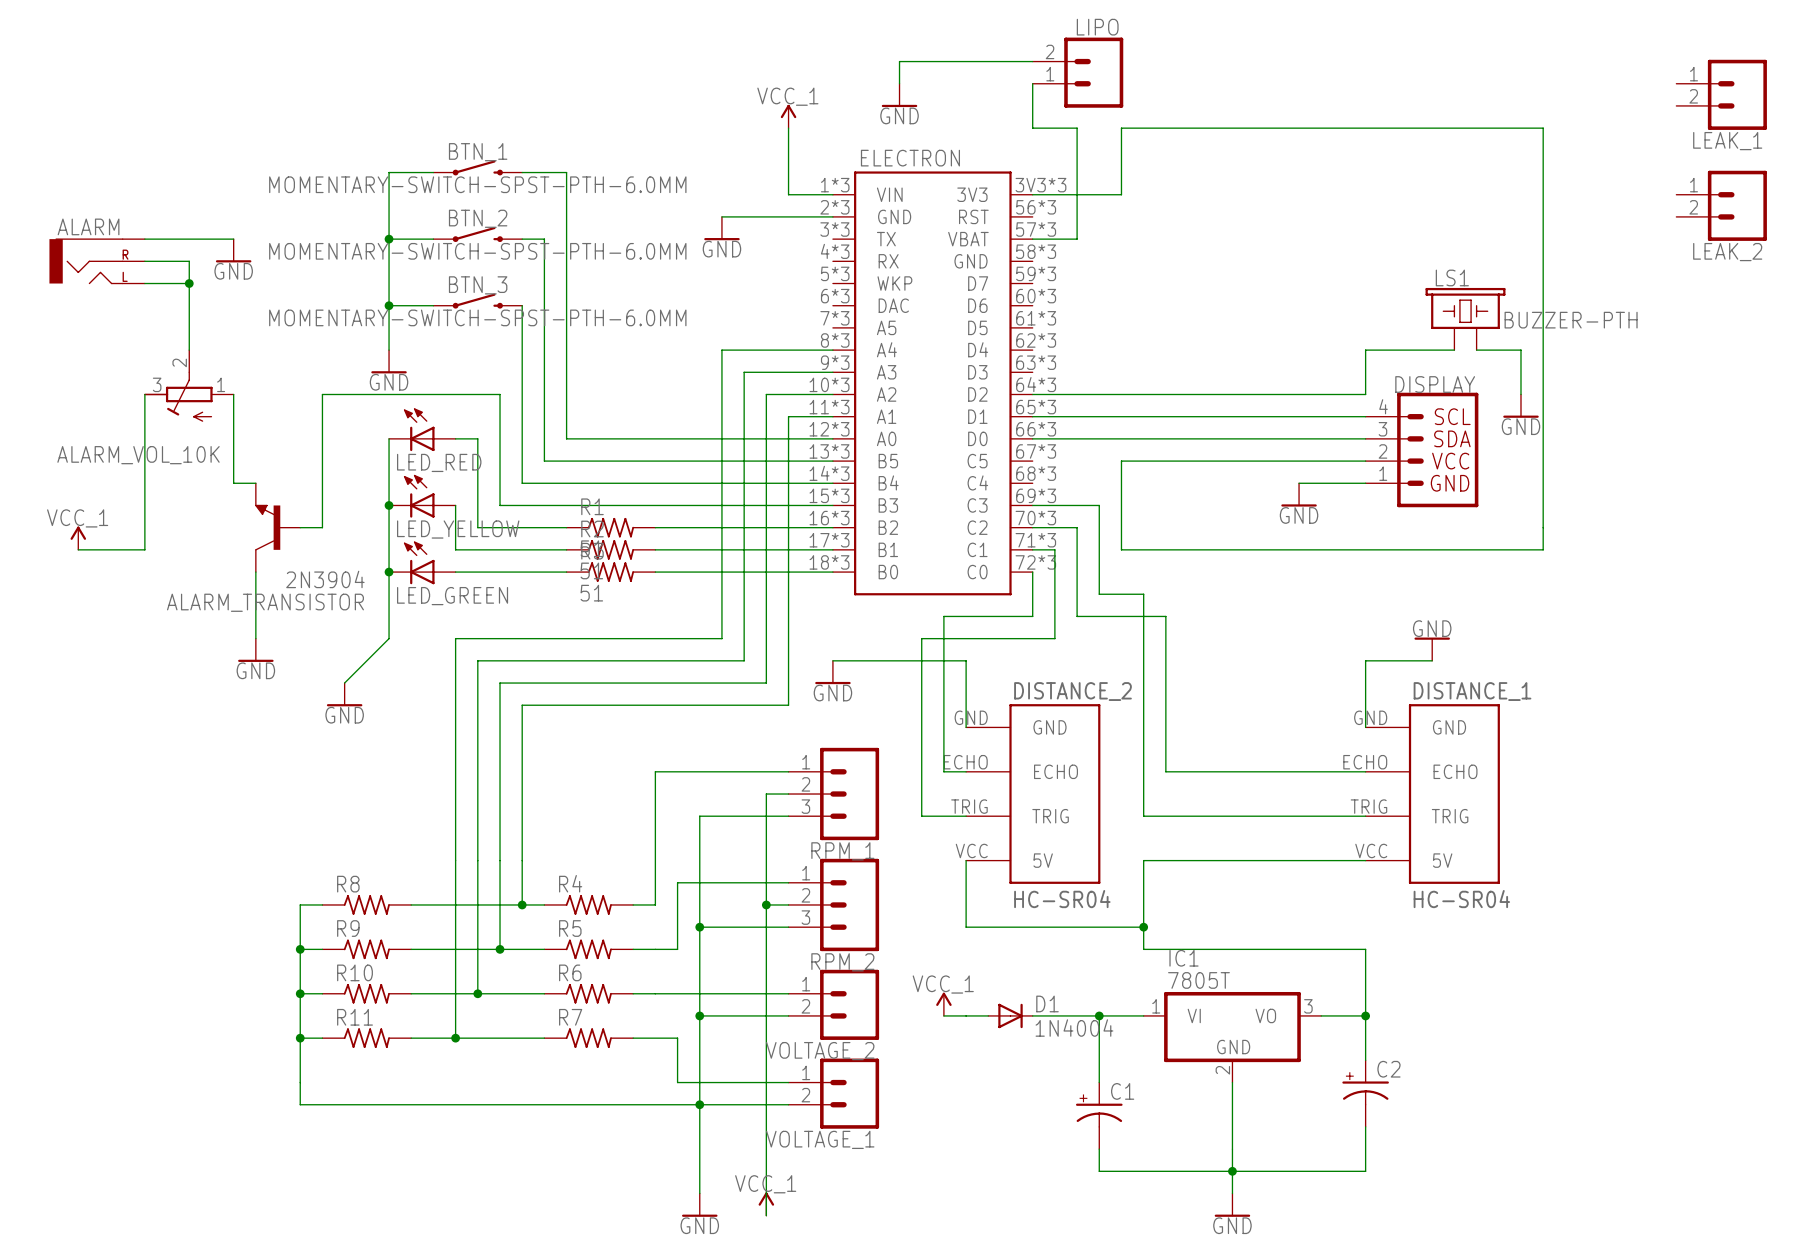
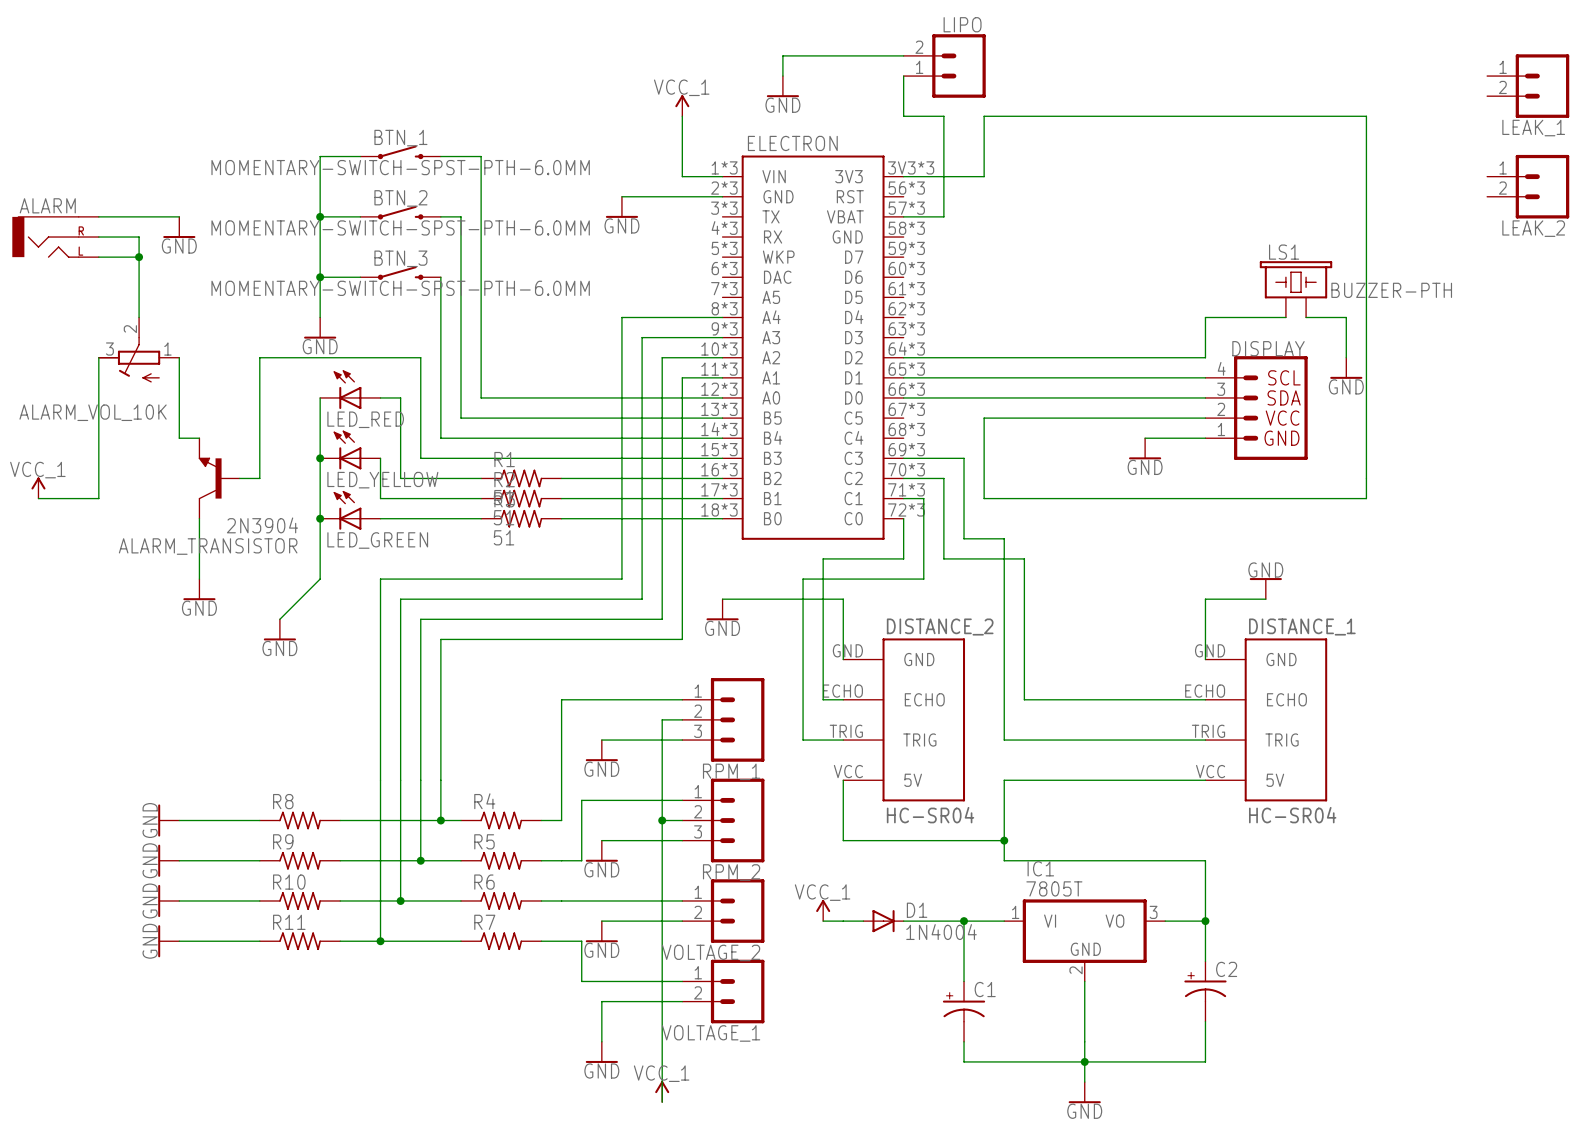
wire: (699, 816) (699, 1104) (300, 1104) (300, 904) -> (179, 820) (239, 820)
power symbol: none -> GND (601, 750)
power symbol: none -> GND (168, 820)
junction: (699, 927) -> none
power symbol: none -> GND (601, 851)
power symbol: none -> GND (168, 860)
wire: none -> (179, 860) (239, 860)
junction: (300, 949) -> none
power symbol: none -> GND (168, 900)
wire: none -> (179, 900) (239, 900)
junction: (300, 993) -> none
junction: (699, 1015) -> none
power symbol: none -> GND (601, 931)
power symbol: none -> GND (168, 941)
wire: none -> (179, 941) (239, 941)
junction: (300, 1038) -> none
junction: (699, 1104) -> none
power symbol position: GND (699, 1205) -> GND (601, 1052)

